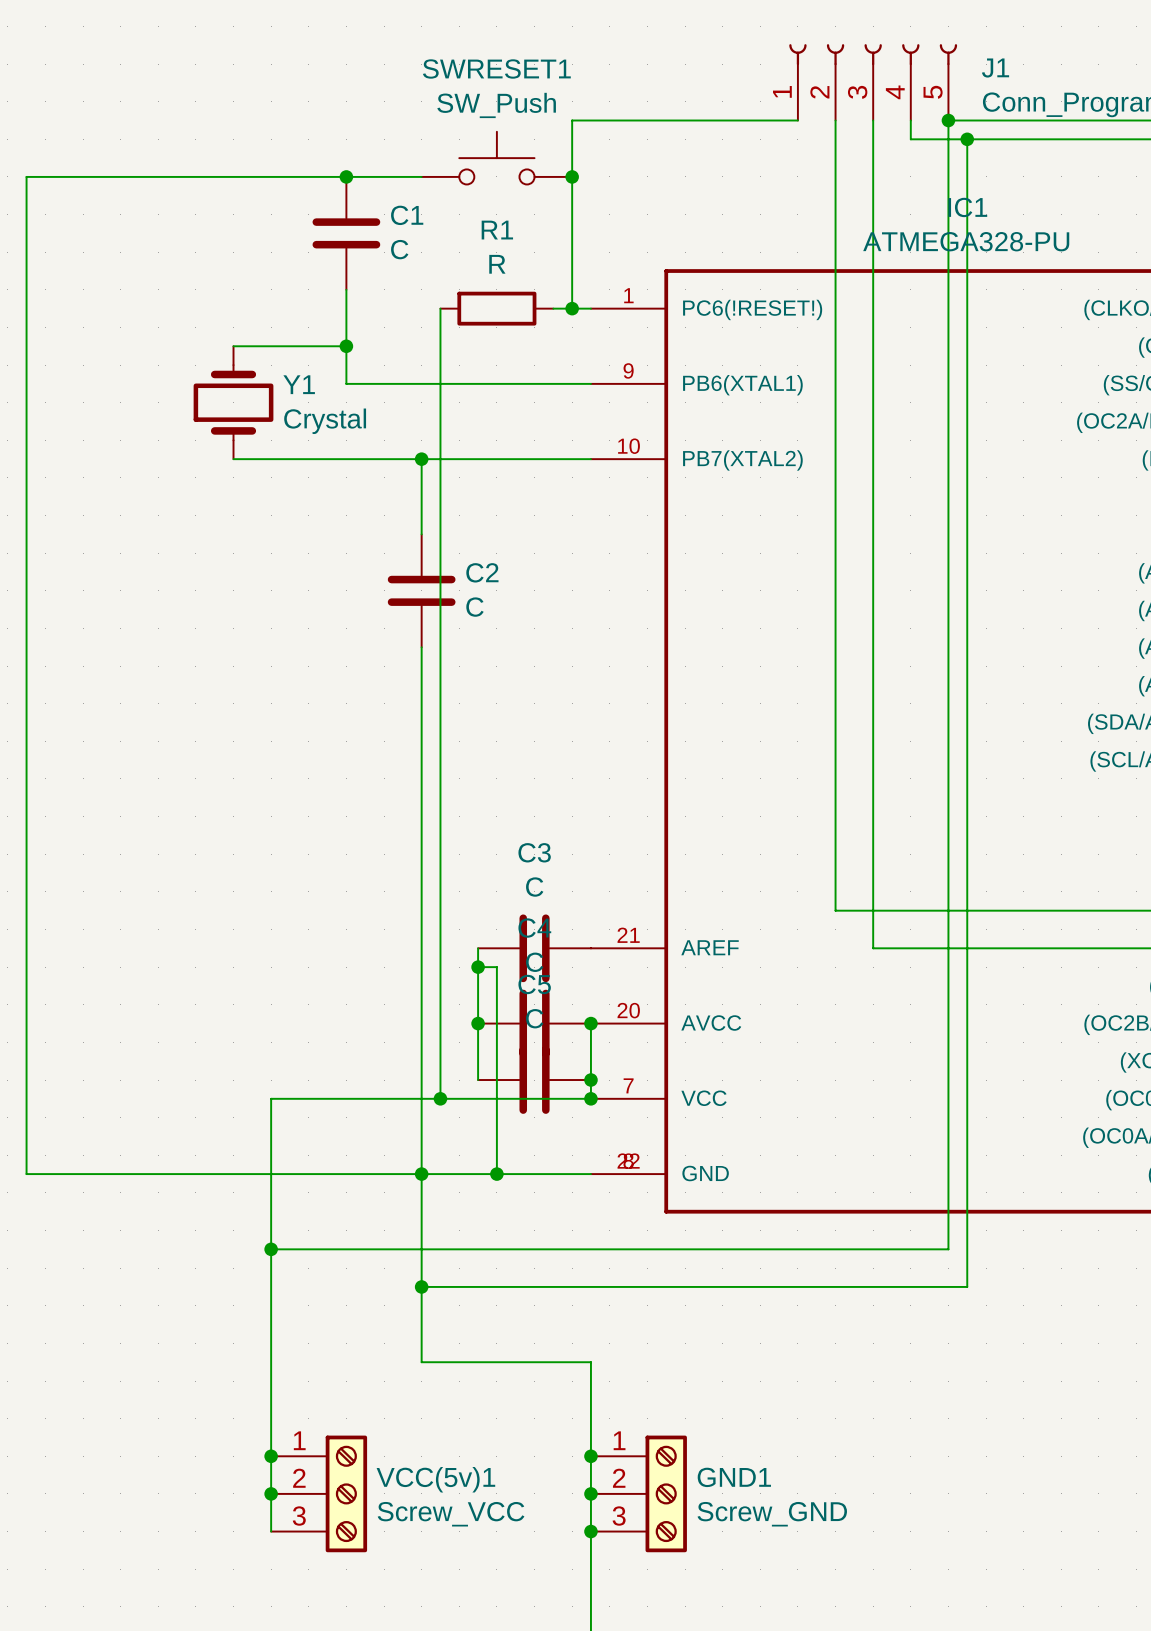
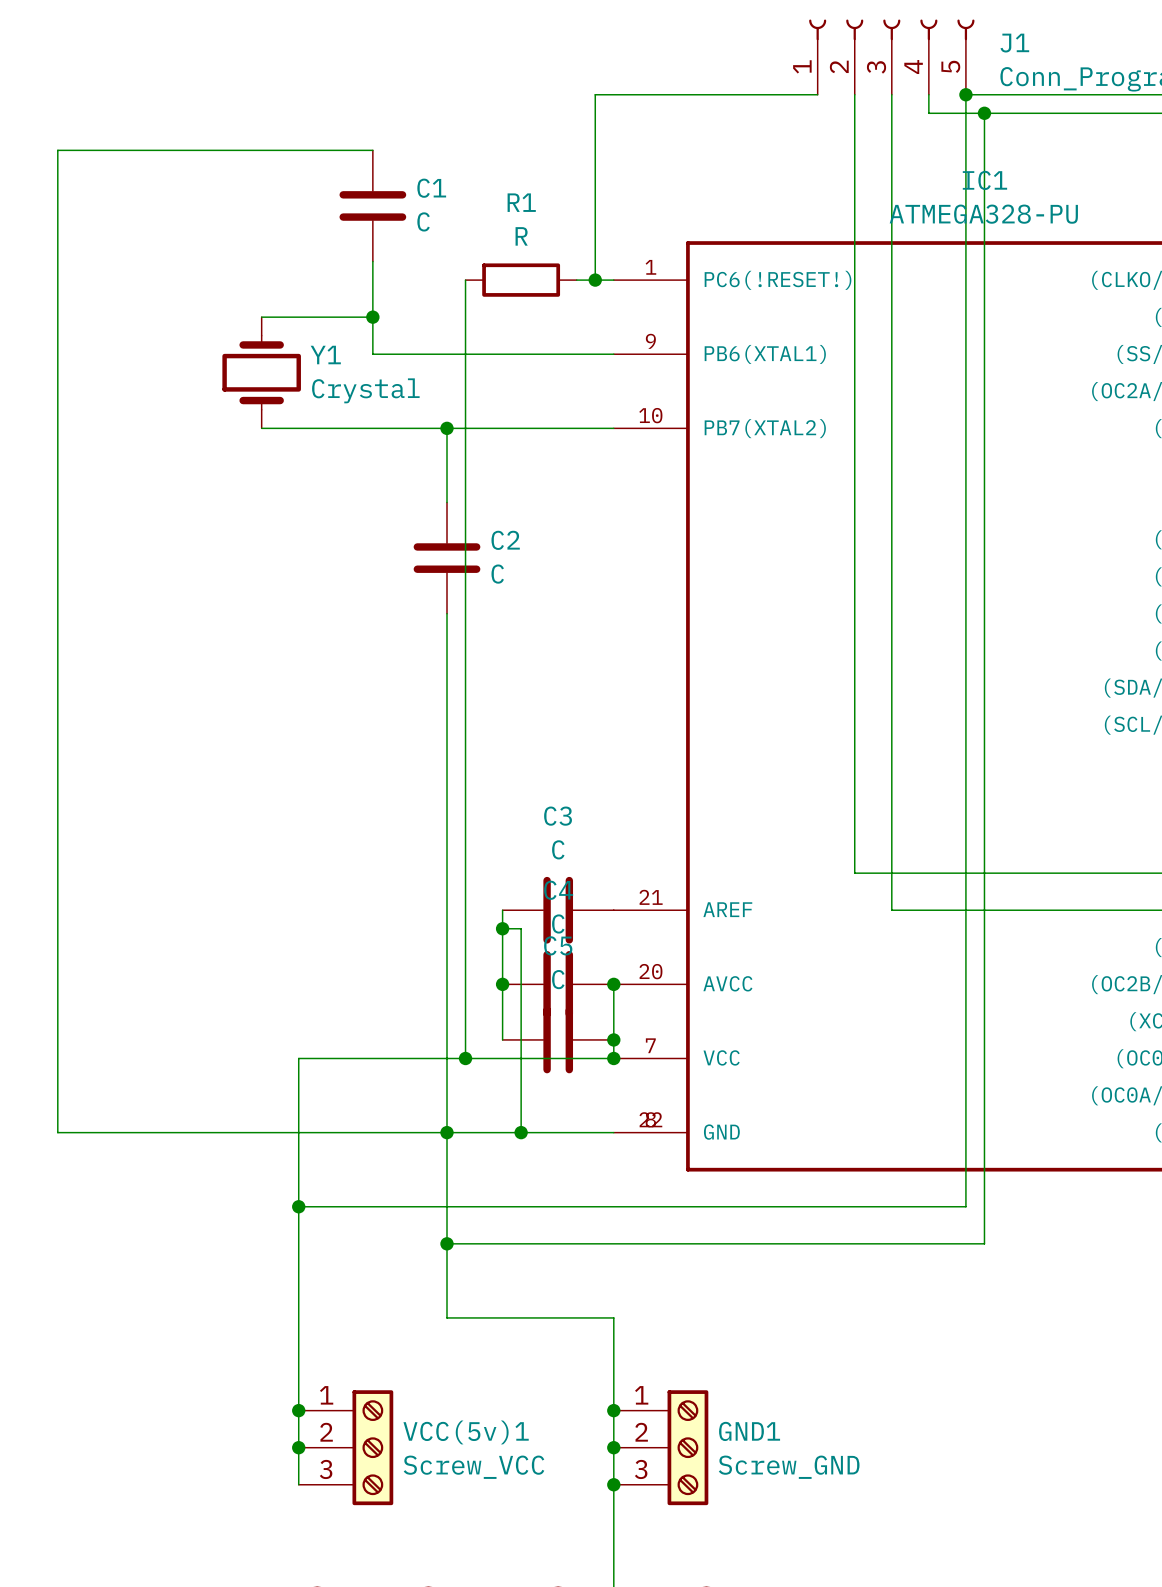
SWRESET1: SW_Push (496, 158) -> none
wire: (346, 176) (421, 176) -> none
junction: (346, 176) -> none
junction: (572, 176) -> none

